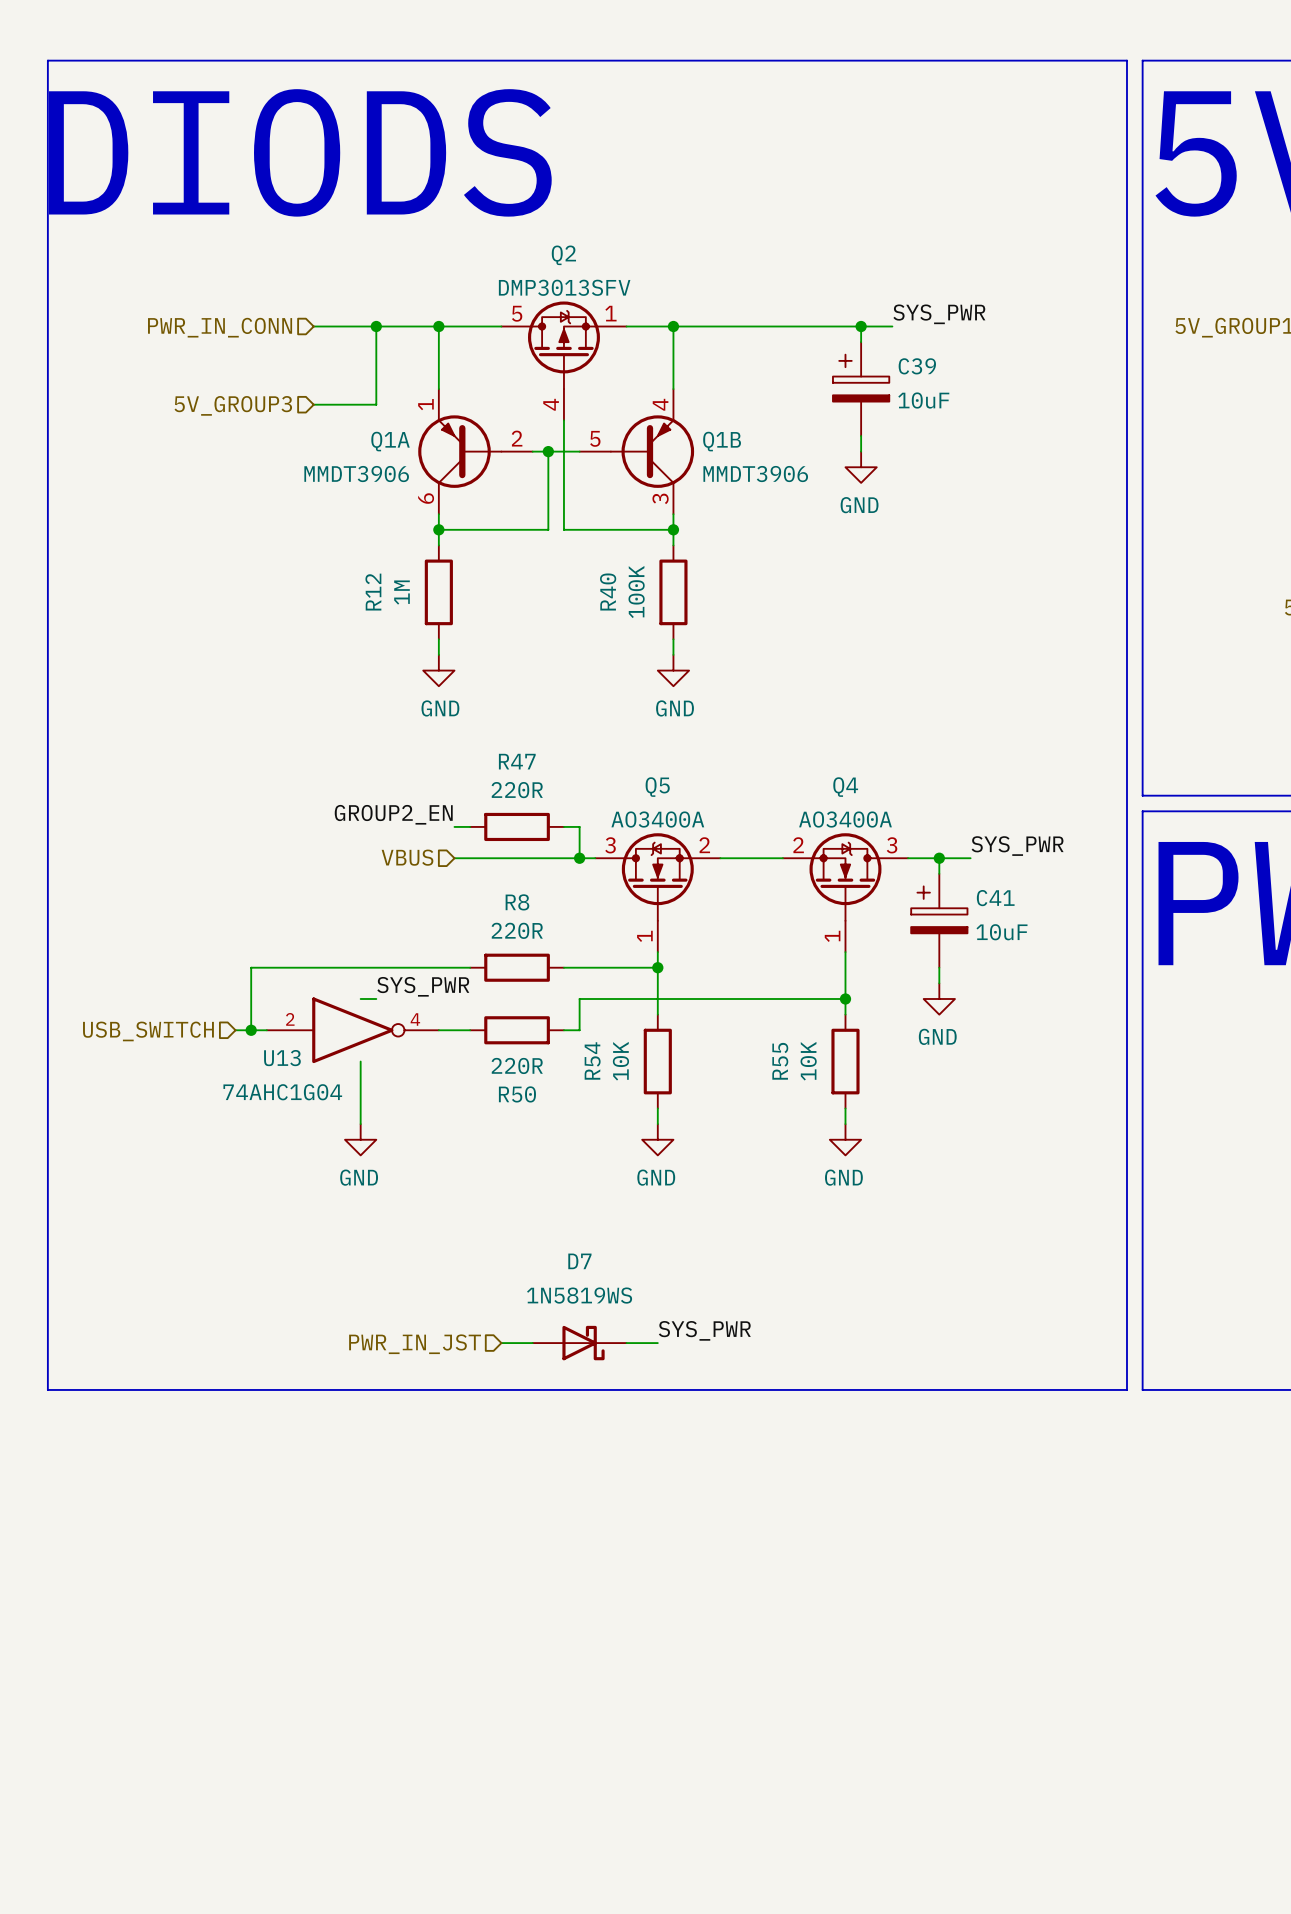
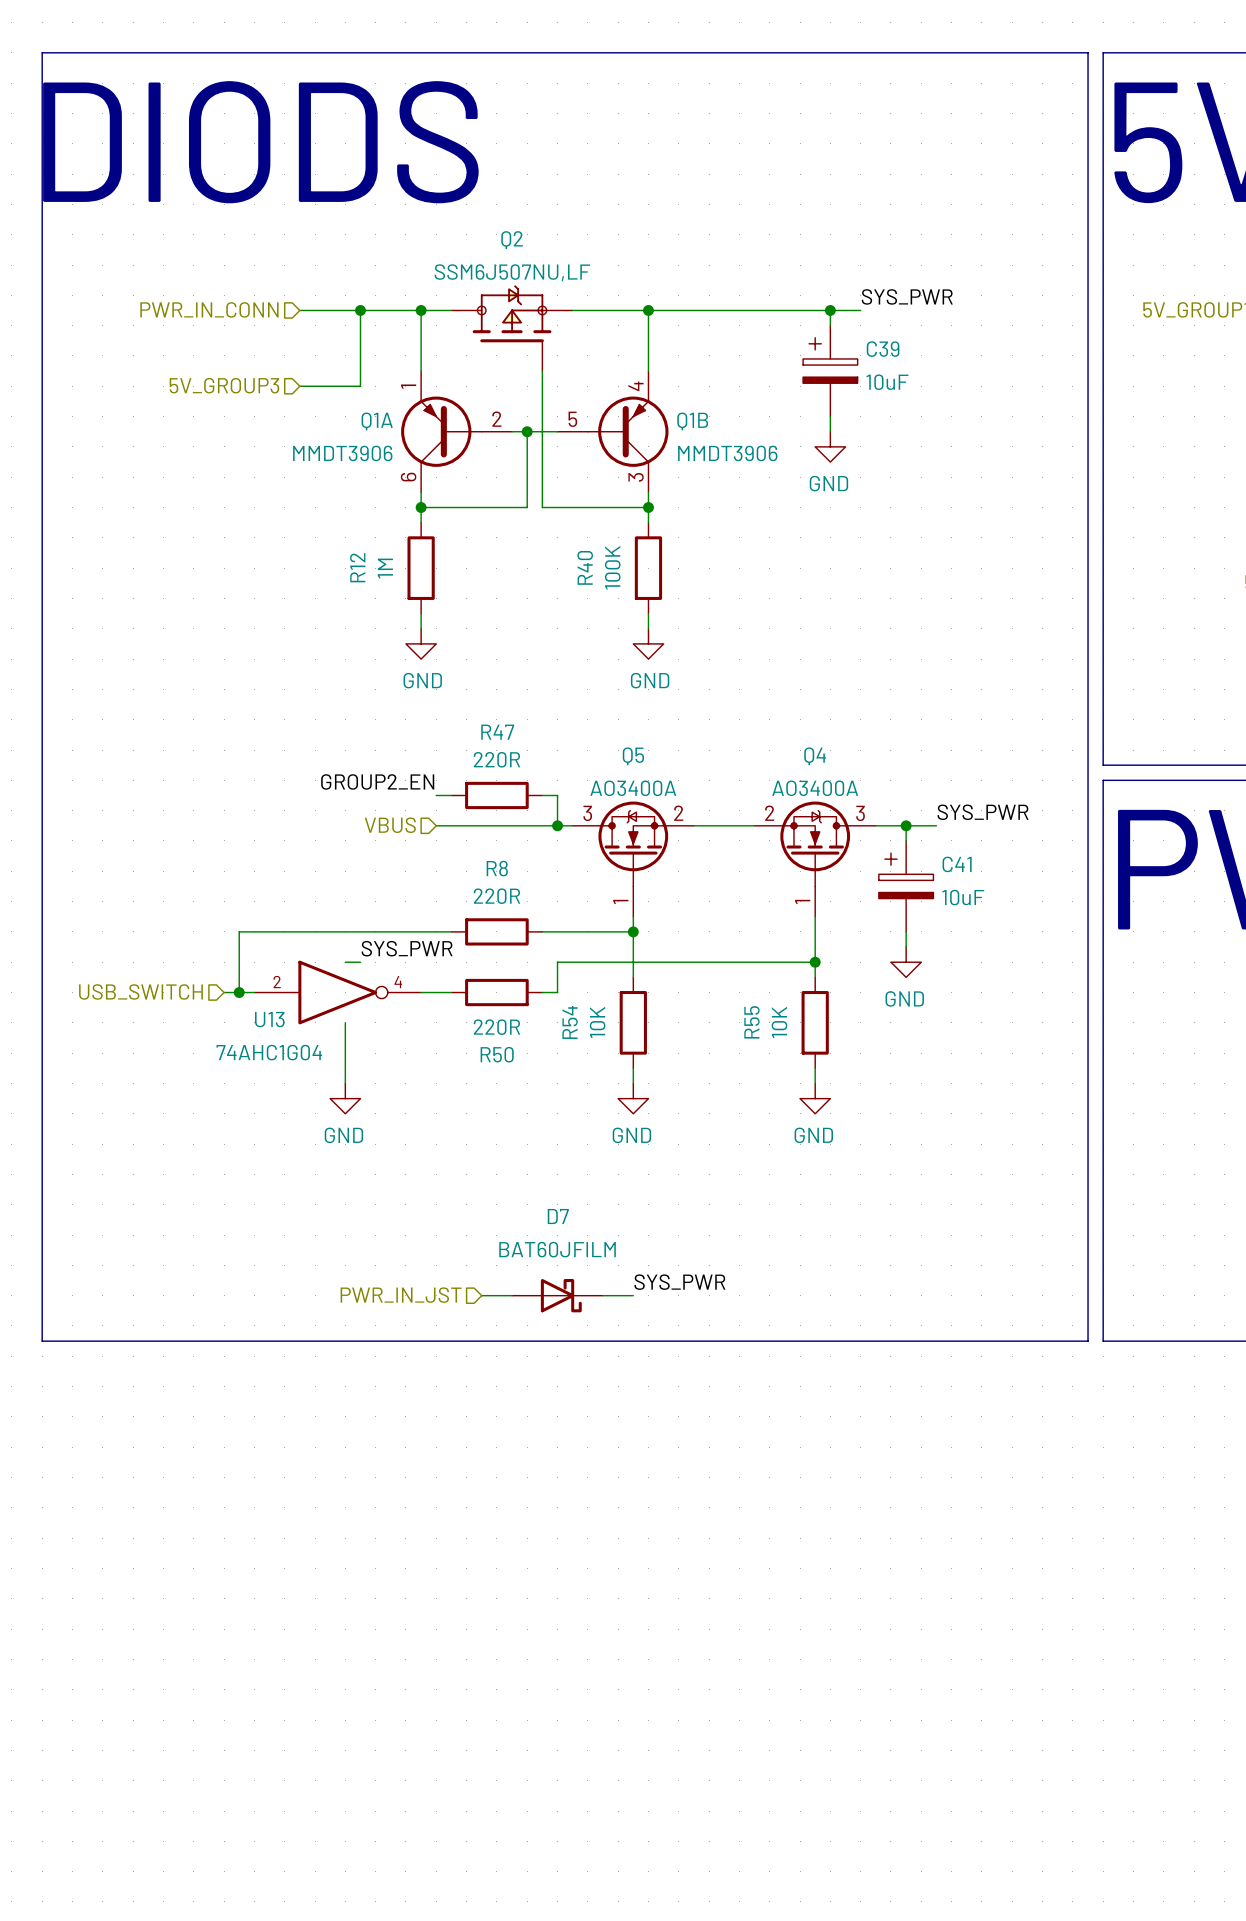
Q2 value: DMP3013SFV (564, 287) -> SSM6J507NU,LF (512, 272)
Q2 symbol: [501, 301, 627, 421] -> [451, 285, 573, 372]
D7 value: 1N5819WS (579, 1295) -> BAT60JFILM (557, 1249)

